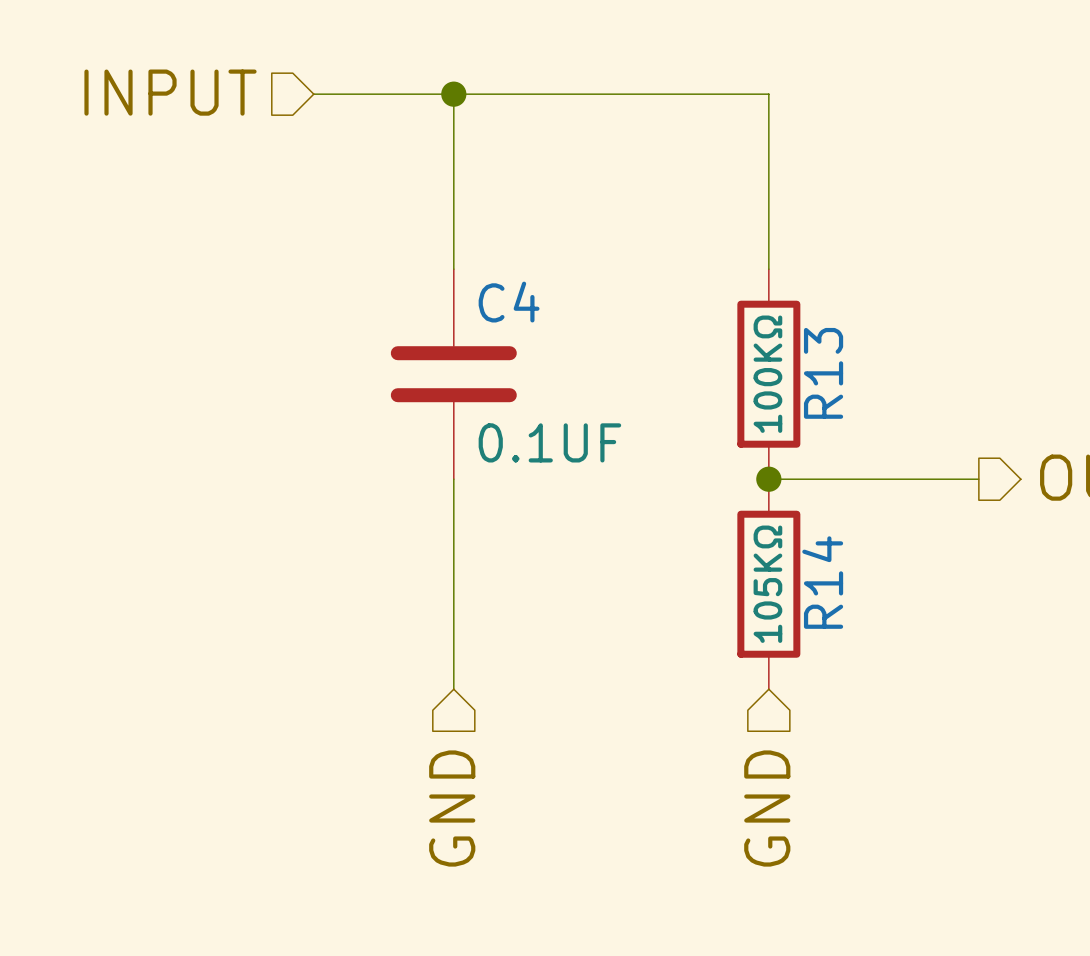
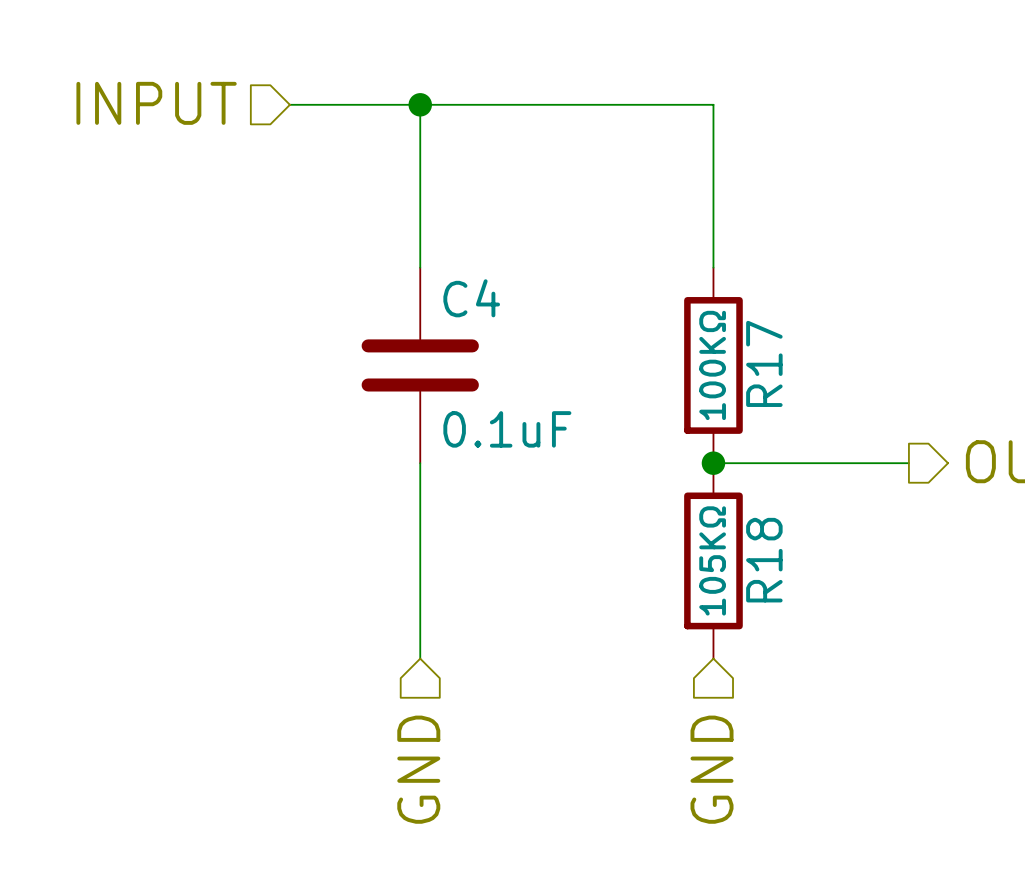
R13 name: R13 (823, 373) -> R17 (764, 363)
C4 value: 0.1UF (549, 442) -> 0.1uF (507, 429)
R14 name: R14 (822, 582) -> R18 (764, 560)

